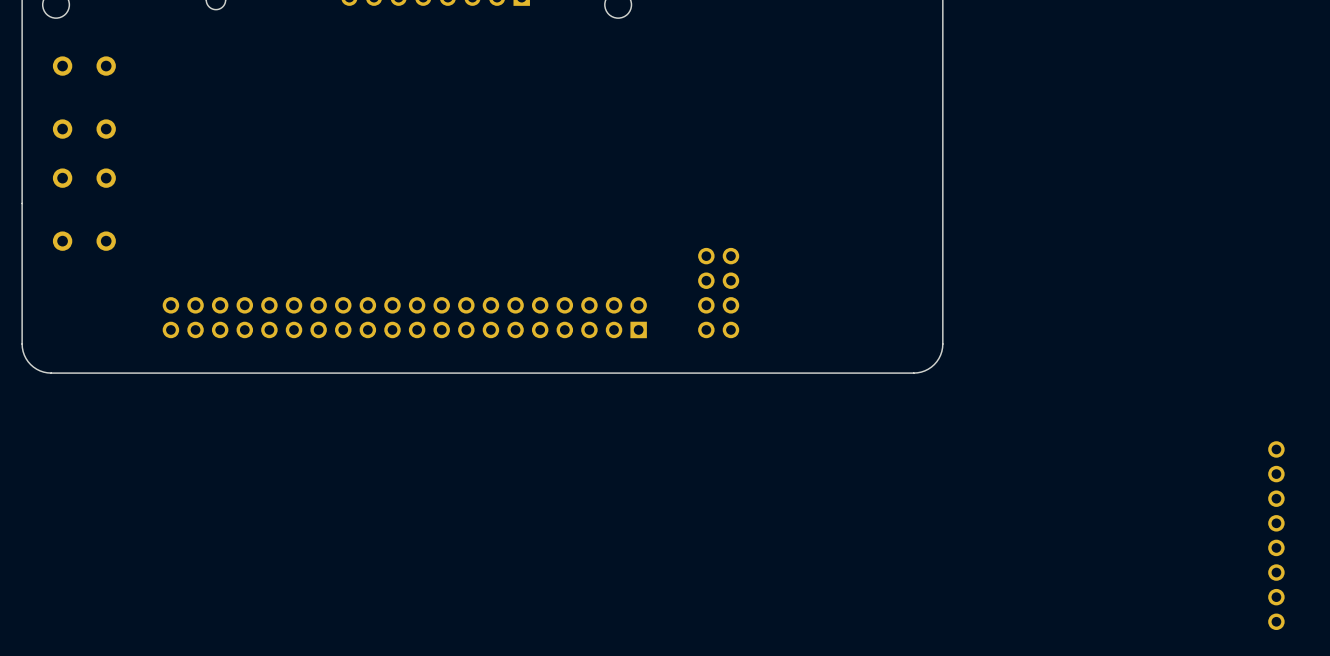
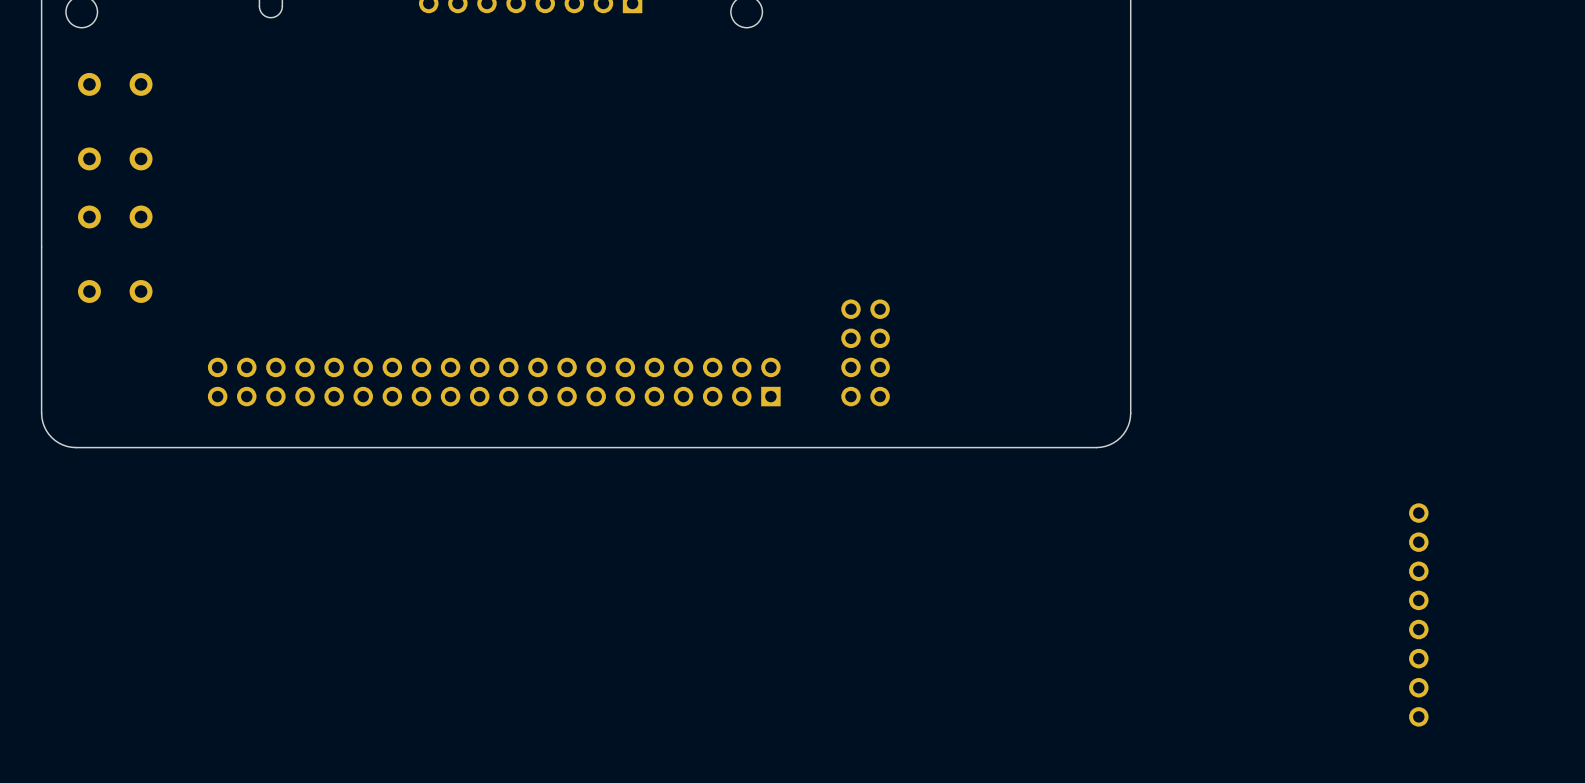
part position: (1276, 535) -> (1418, 614)

